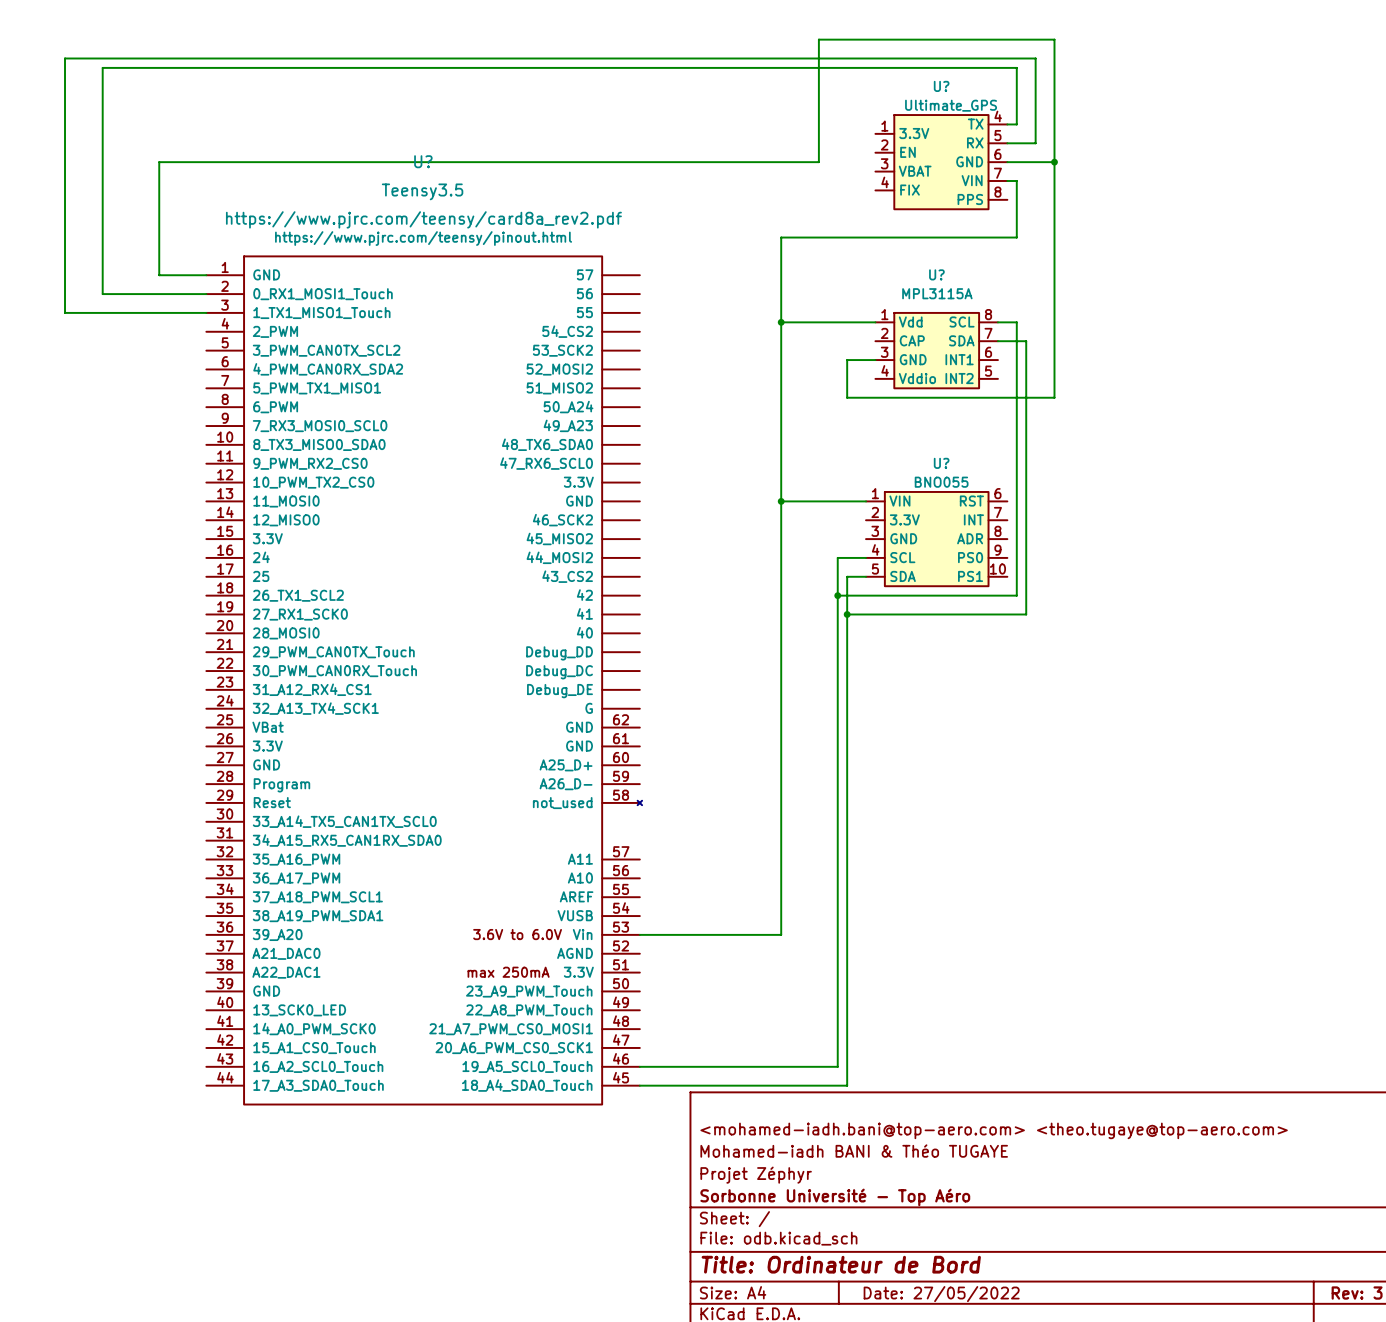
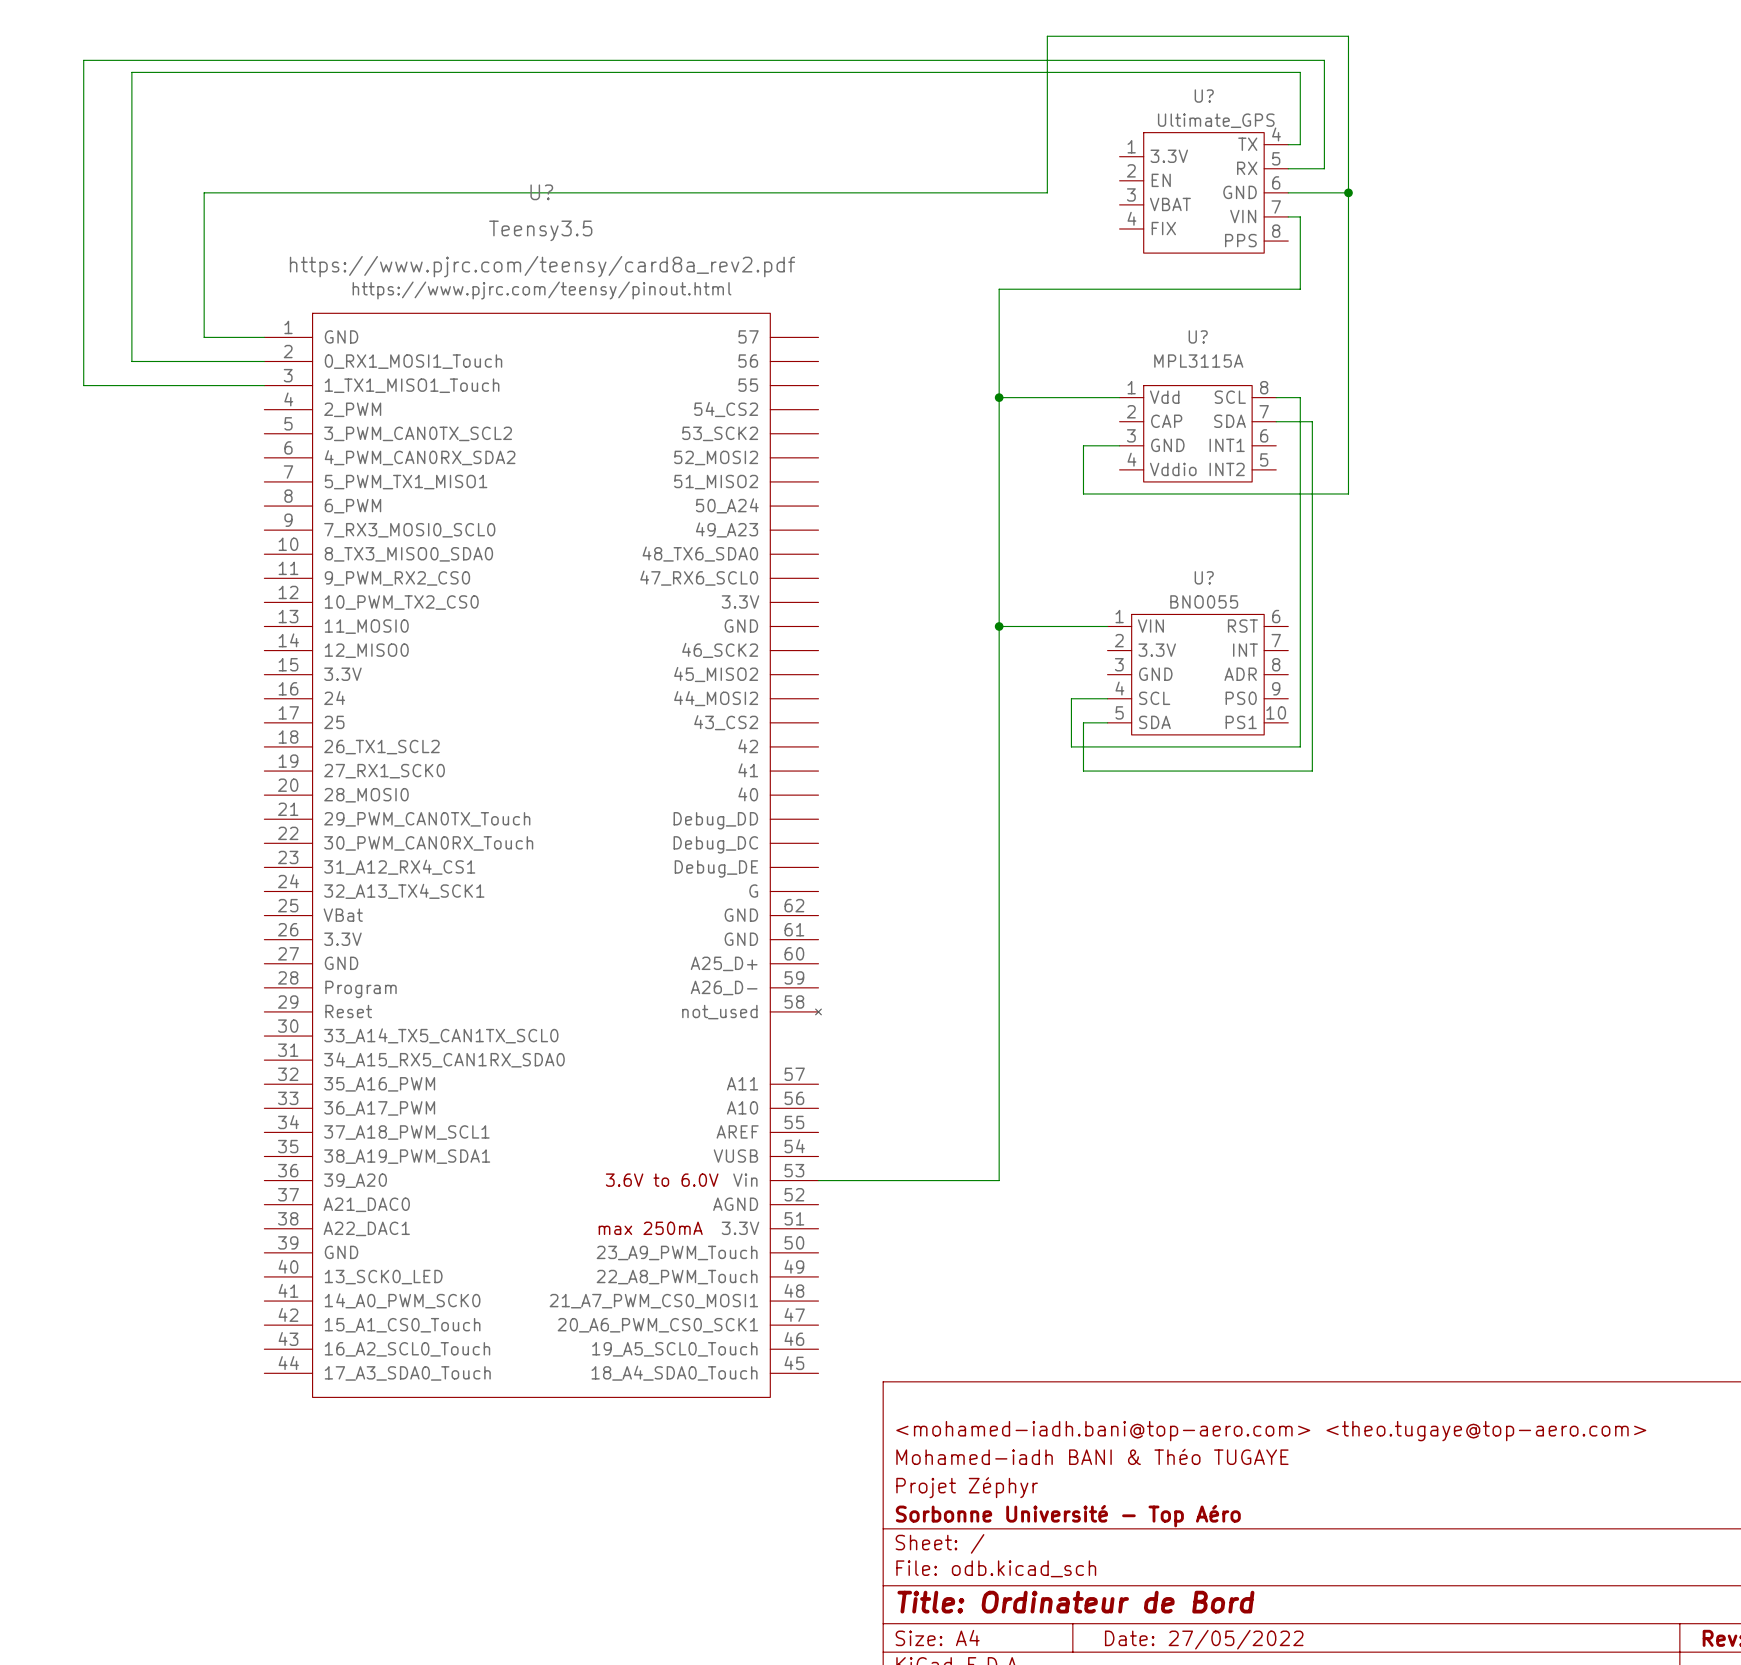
wire: (837, 595) (837, 1066) (639, 1066) -> none
junction: (837, 595) -> none
wire: (847, 614) (847, 1085) (639, 1085) -> none
junction: (847, 614) -> none

